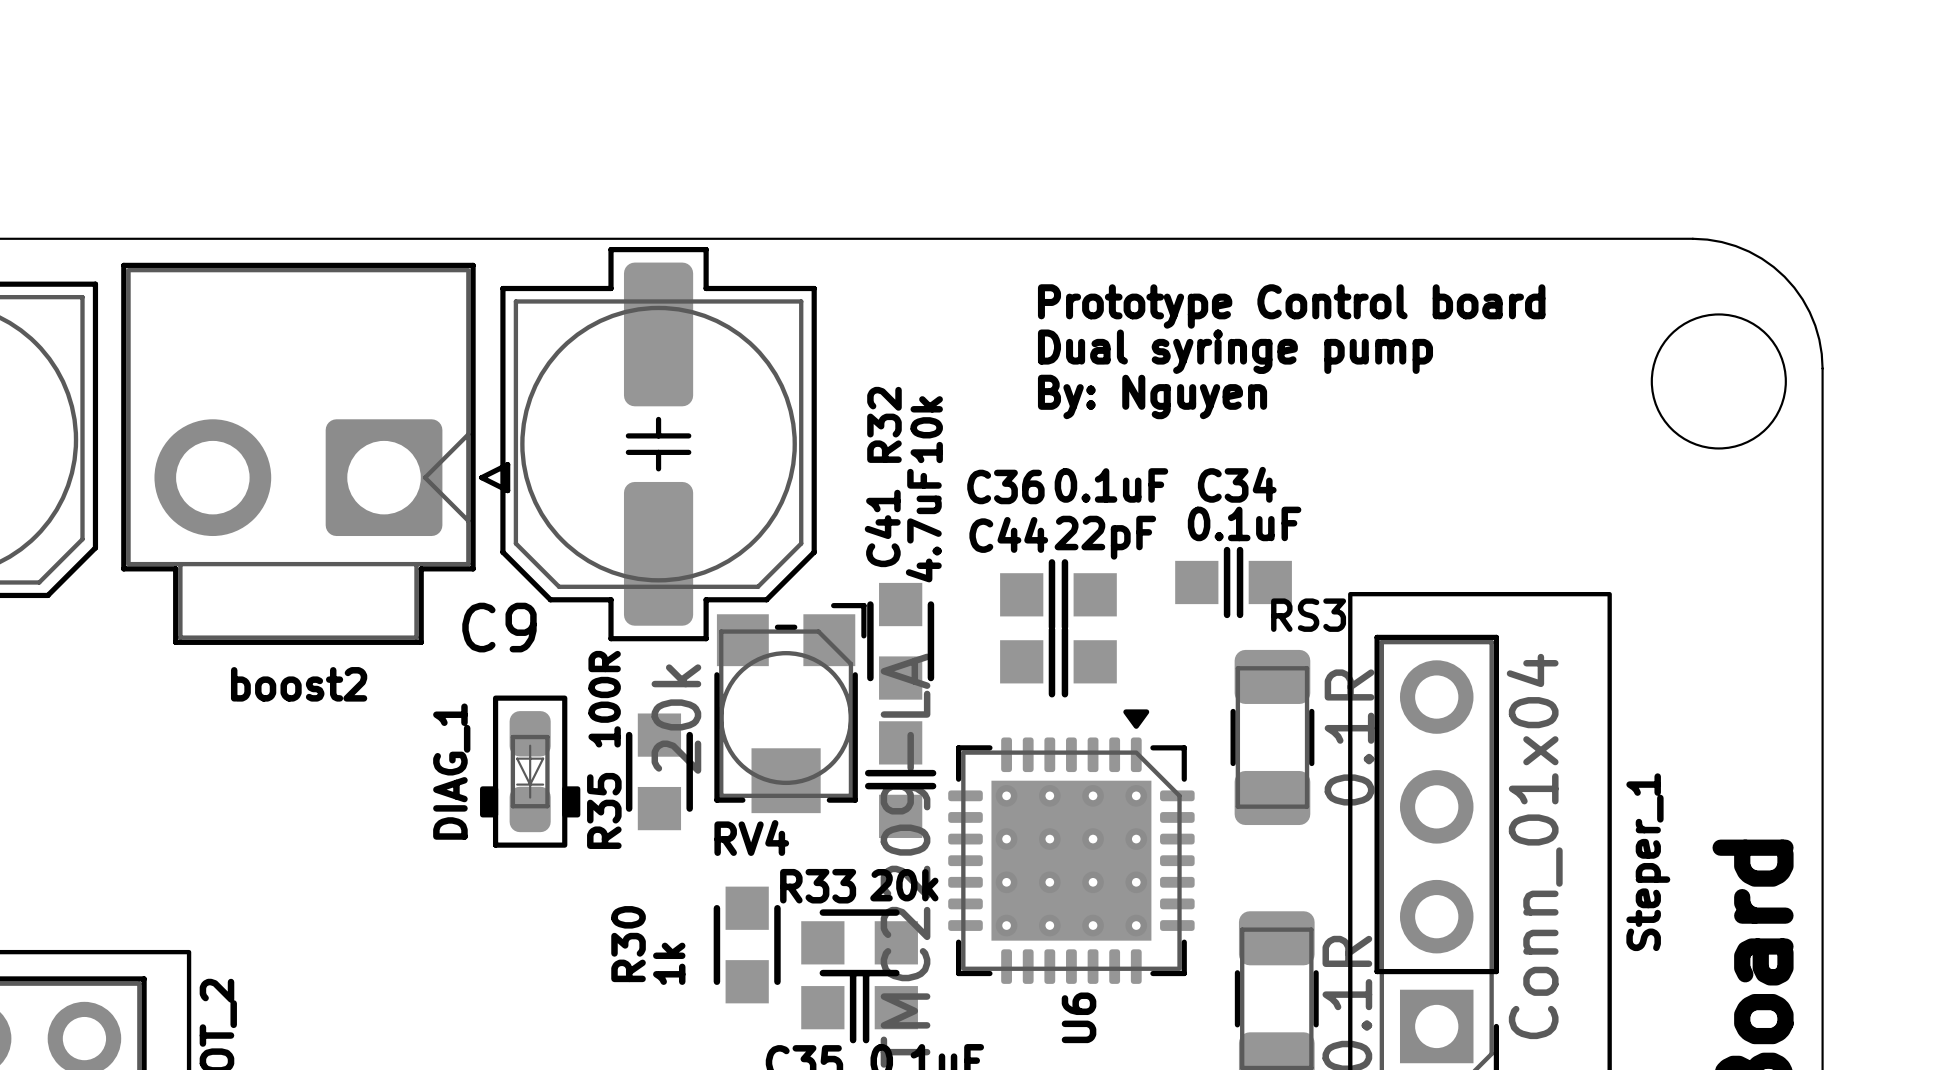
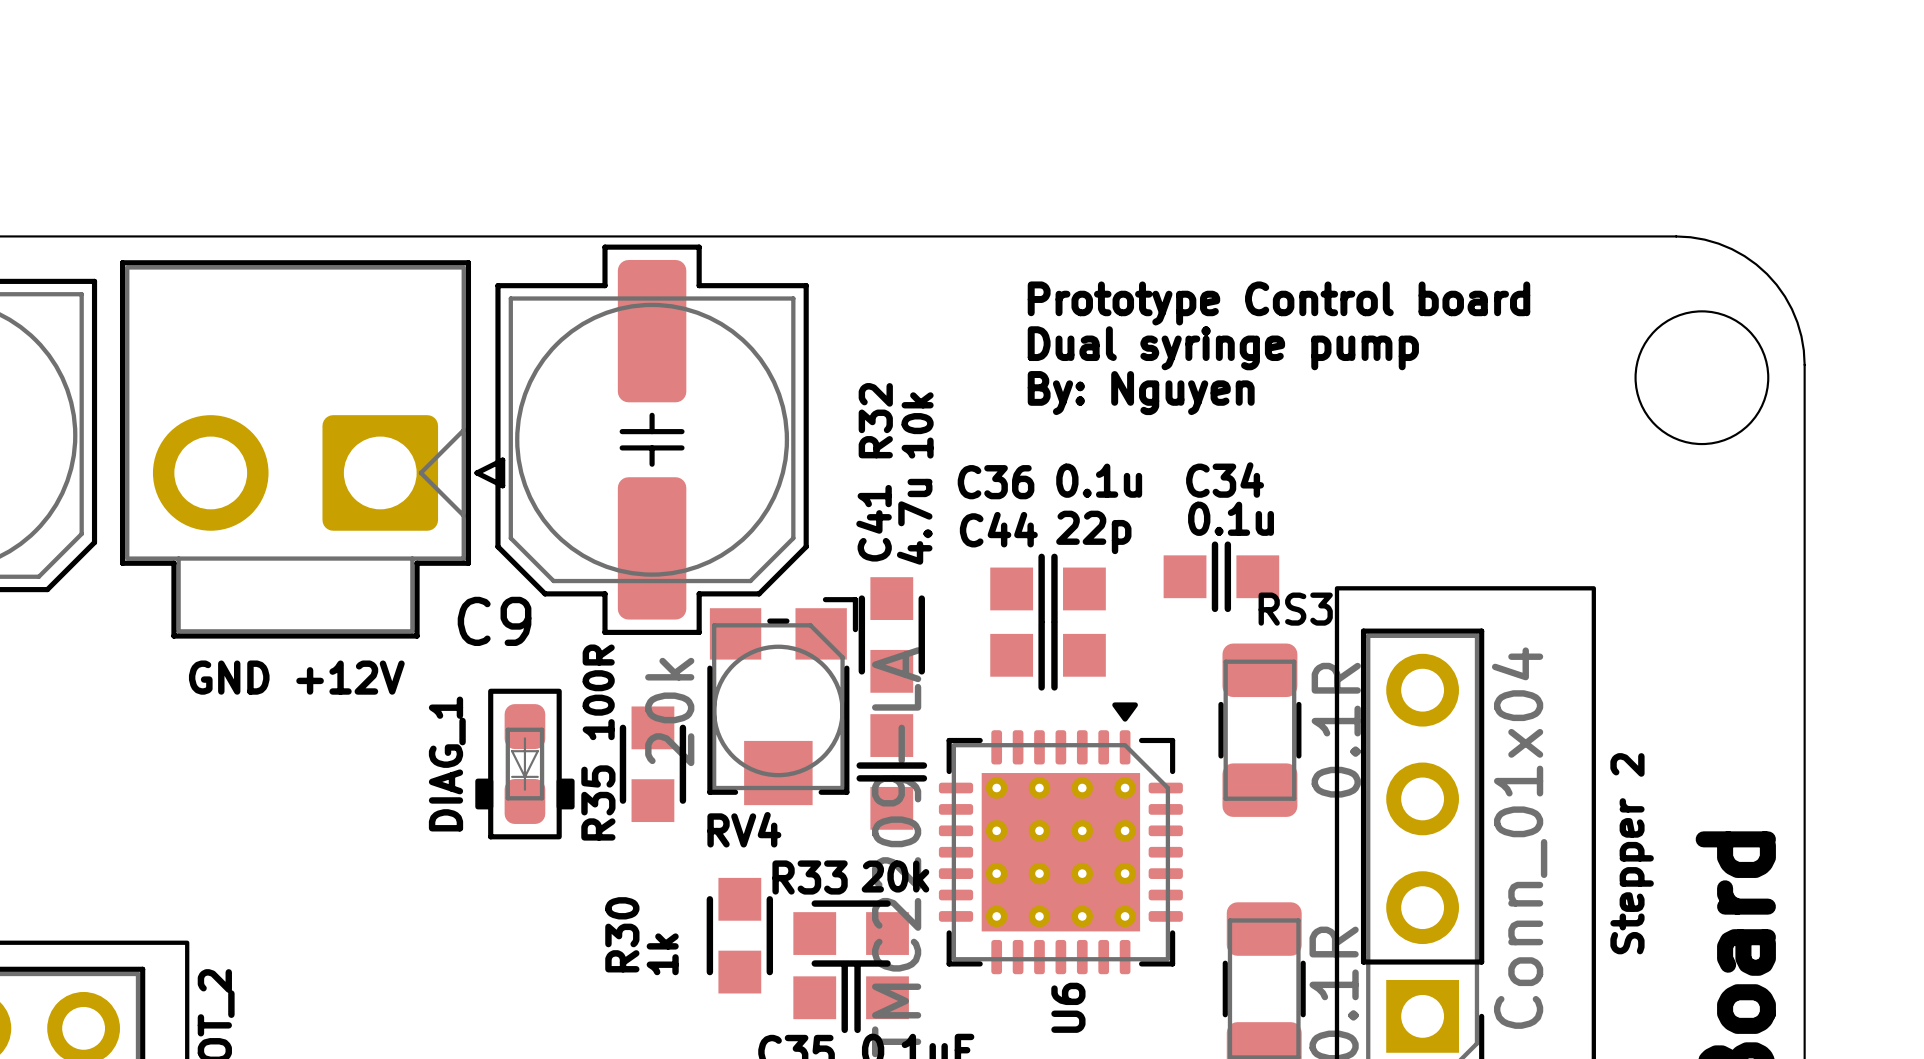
C36 value: 0.1uF (1111, 485) -> 0.1u (1099, 480)
C34 value: 0.1uF (1244, 523) -> 0.1u (1231, 518)
C41 value: 4.7uF (923, 525) -> 4.7u (914, 521)
C44 value: 22pF (1105, 537) -> 22p (1093, 532)
boost2 name: boost2 (299, 684) -> GND +12V (296, 677)
Steper_1 name: Steper_1 (1648, 862) -> Stepper 2 (1632, 853)

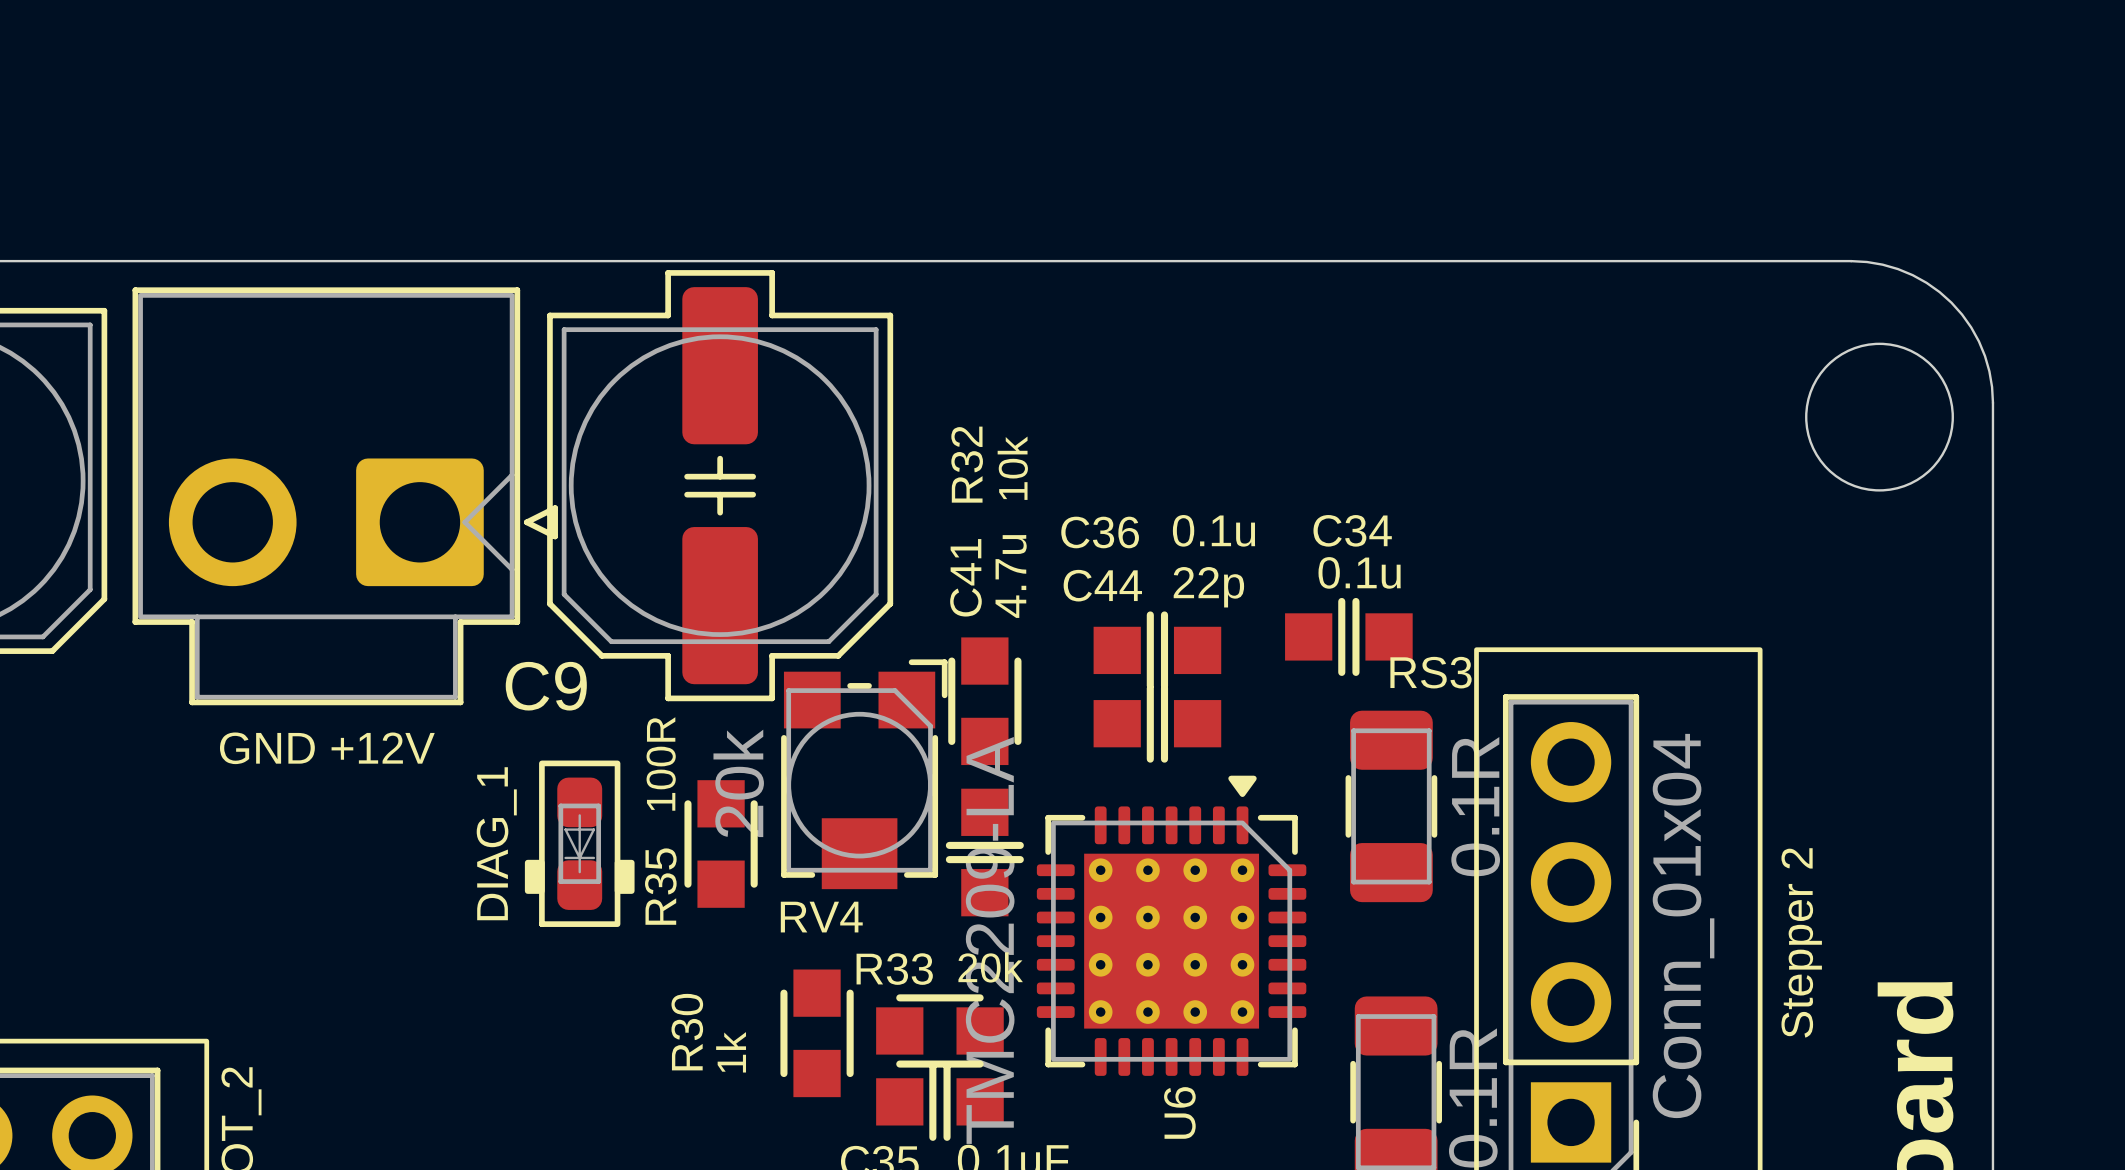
text: Prototype Control board (1278, 303) -> none
text: Dual syringe pump (1223, 348) -> none
text: By: Nguyen (1141, 393) -> none

